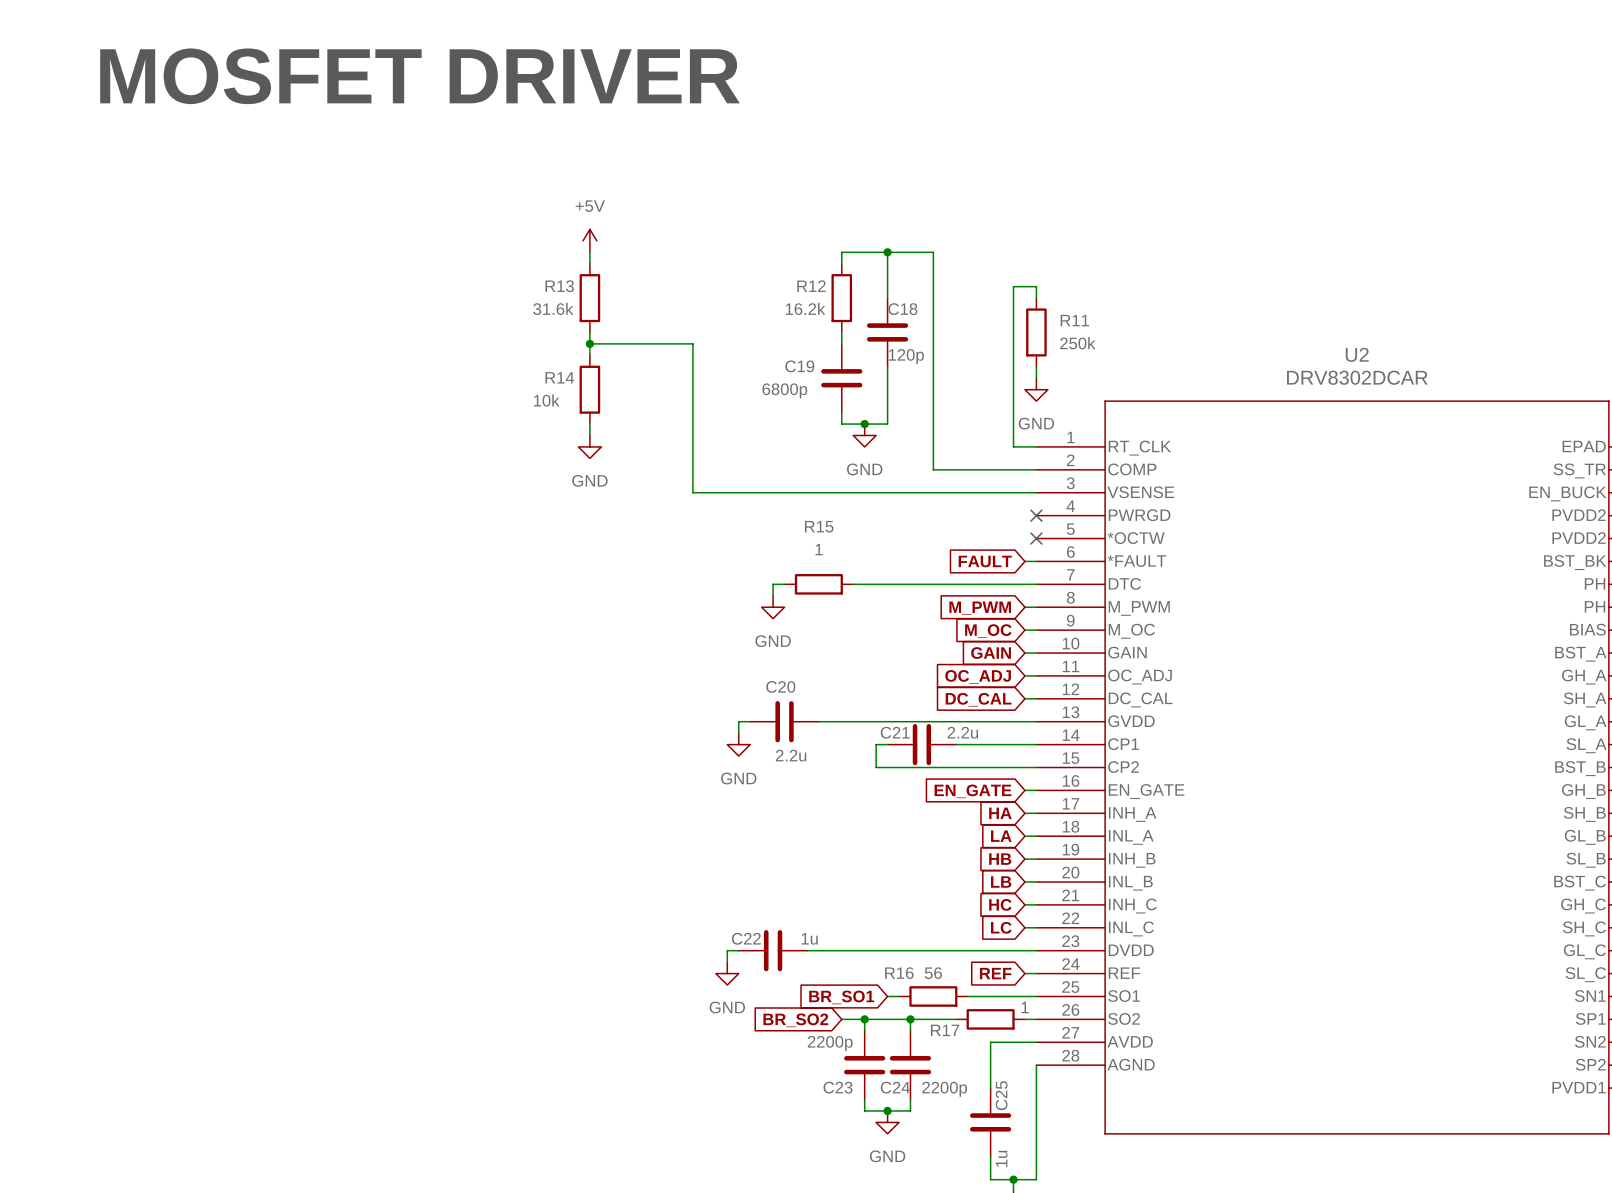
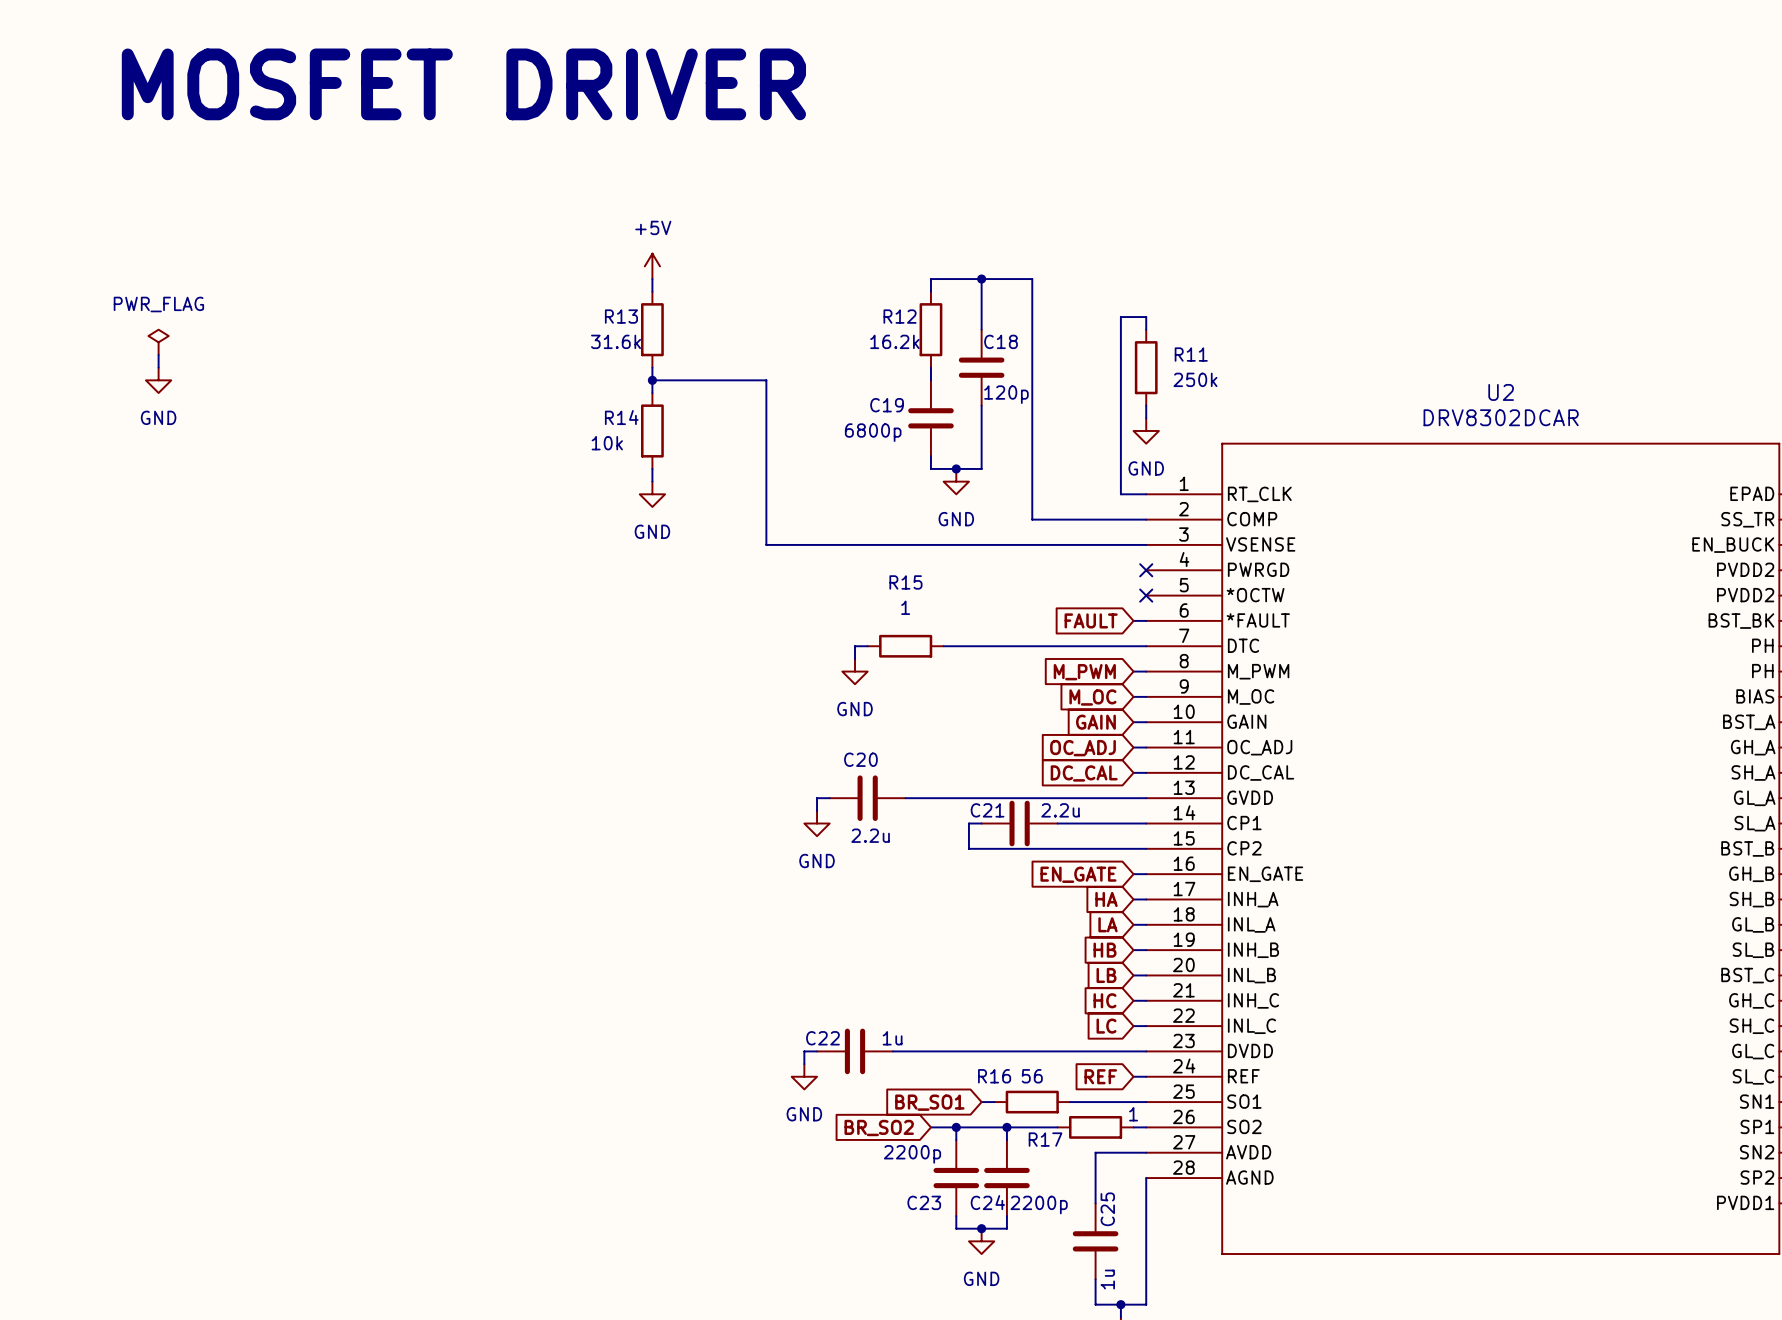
power symbol: none -> PWR_FLAG (158, 342)
wire: none -> (158, 355) (158, 367)
power symbol: none -> GND (158, 380)

